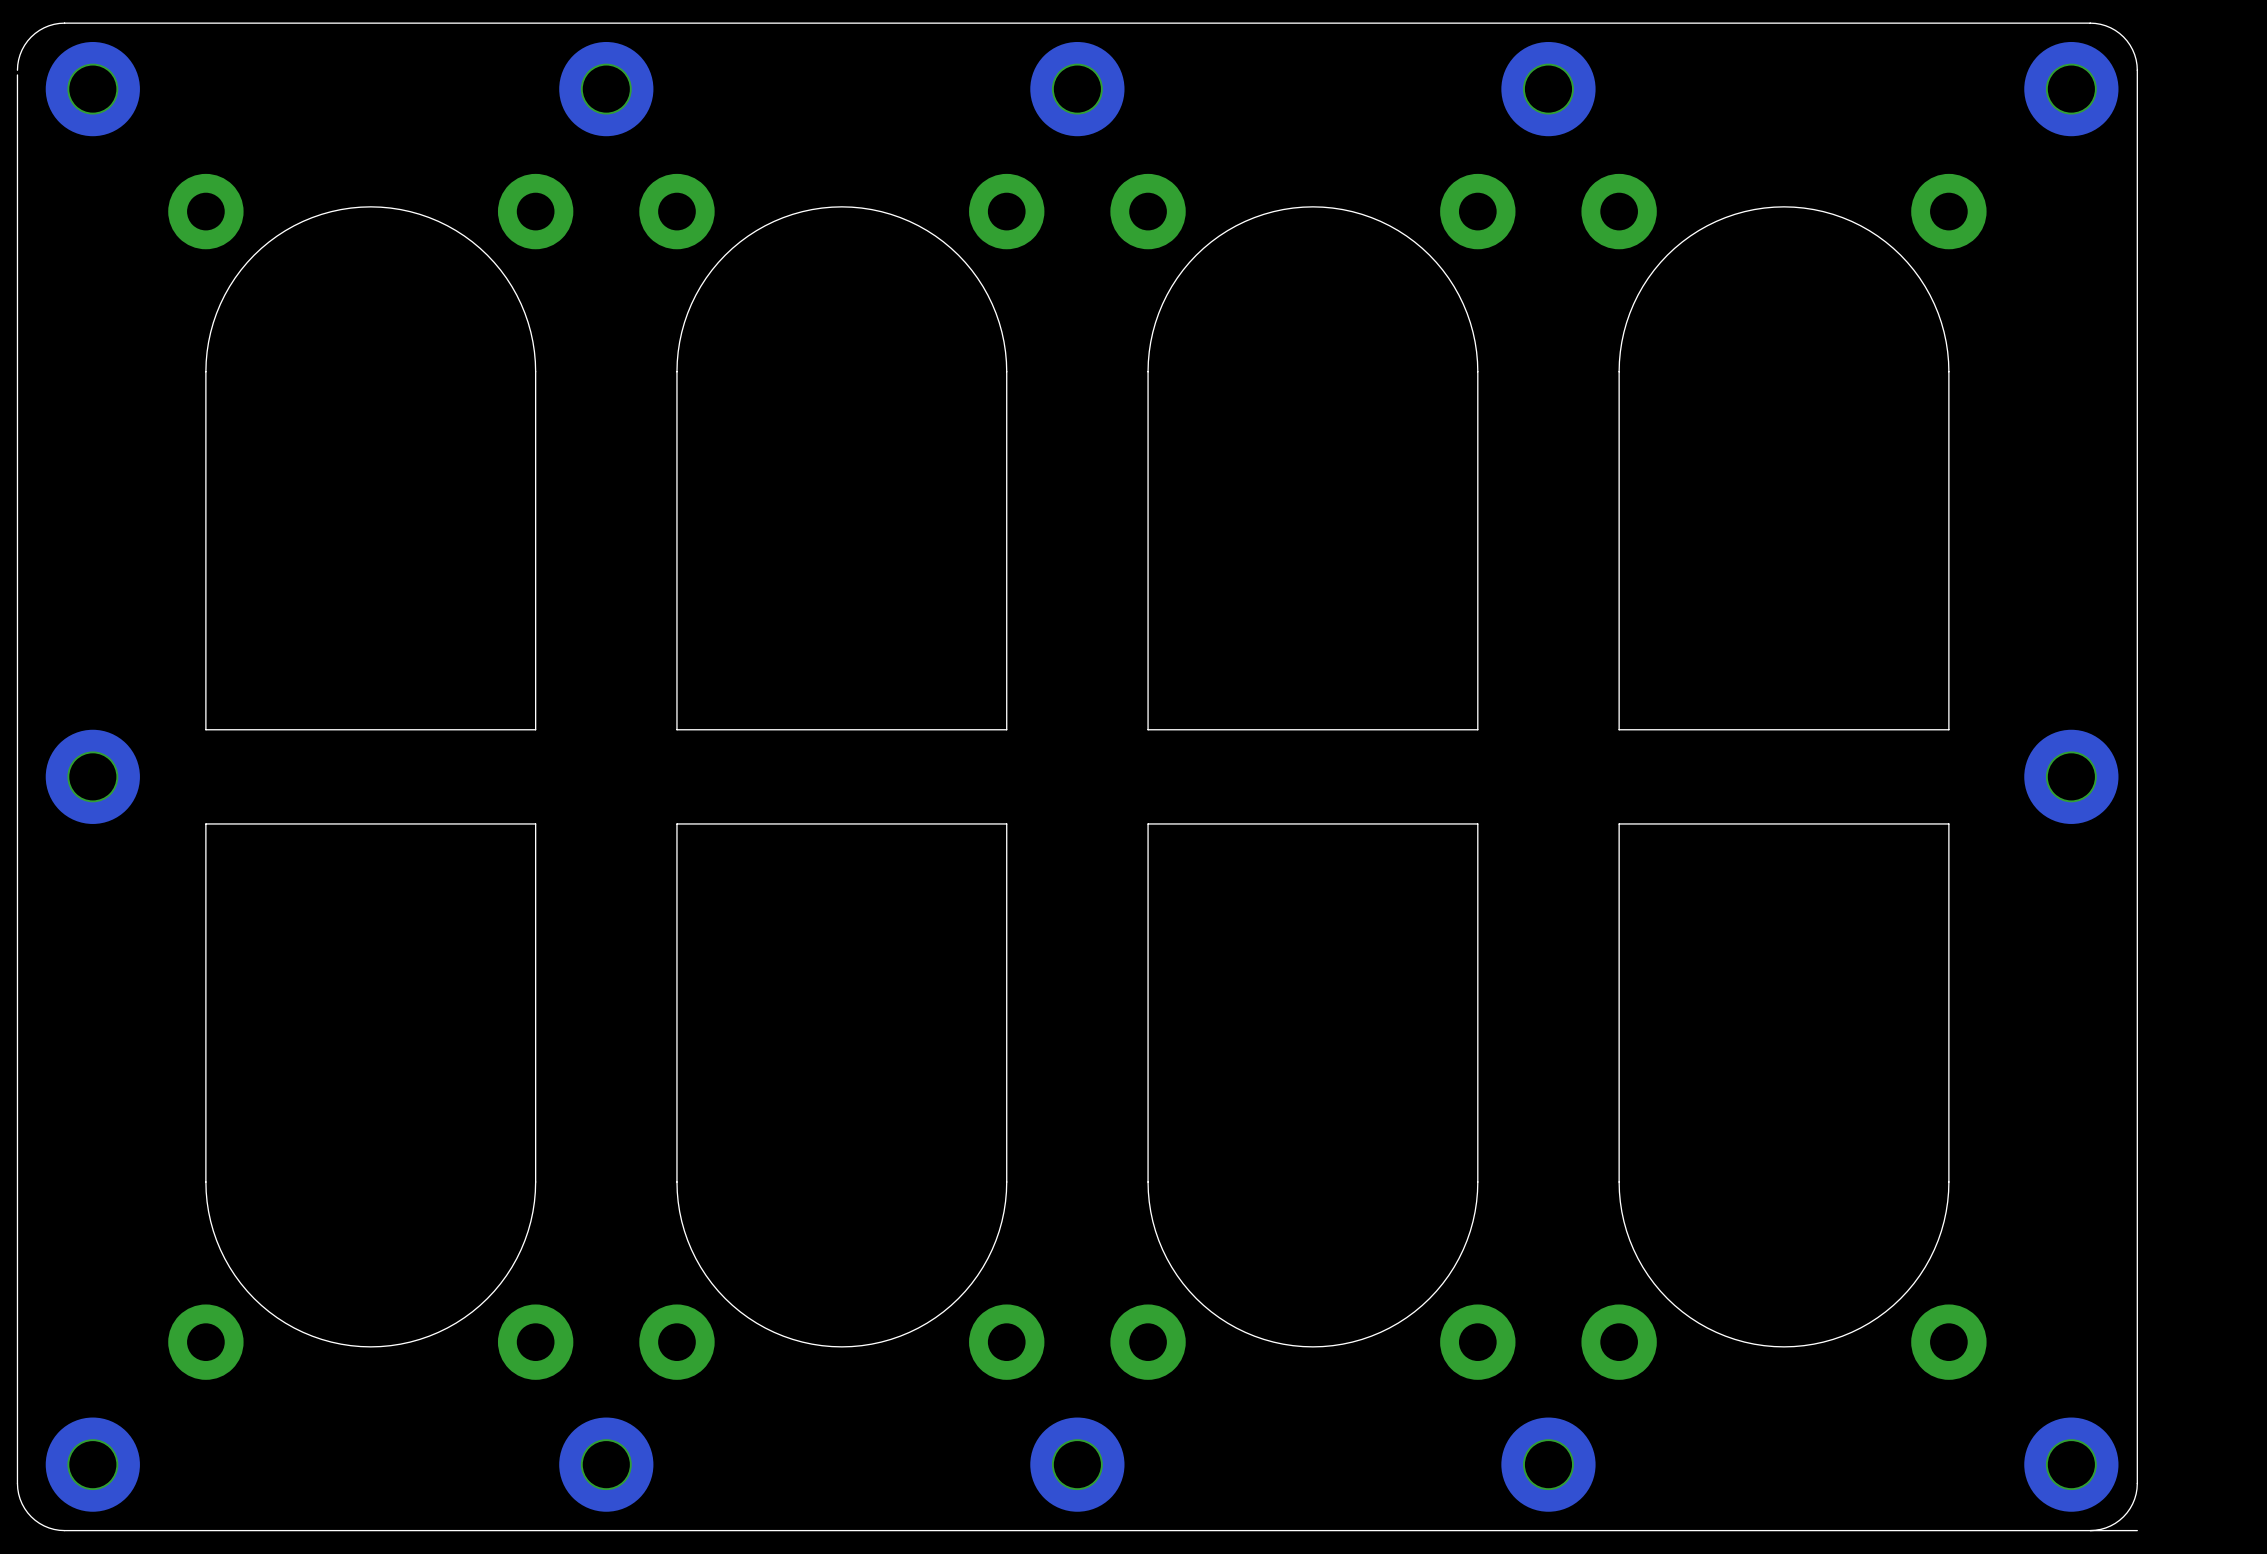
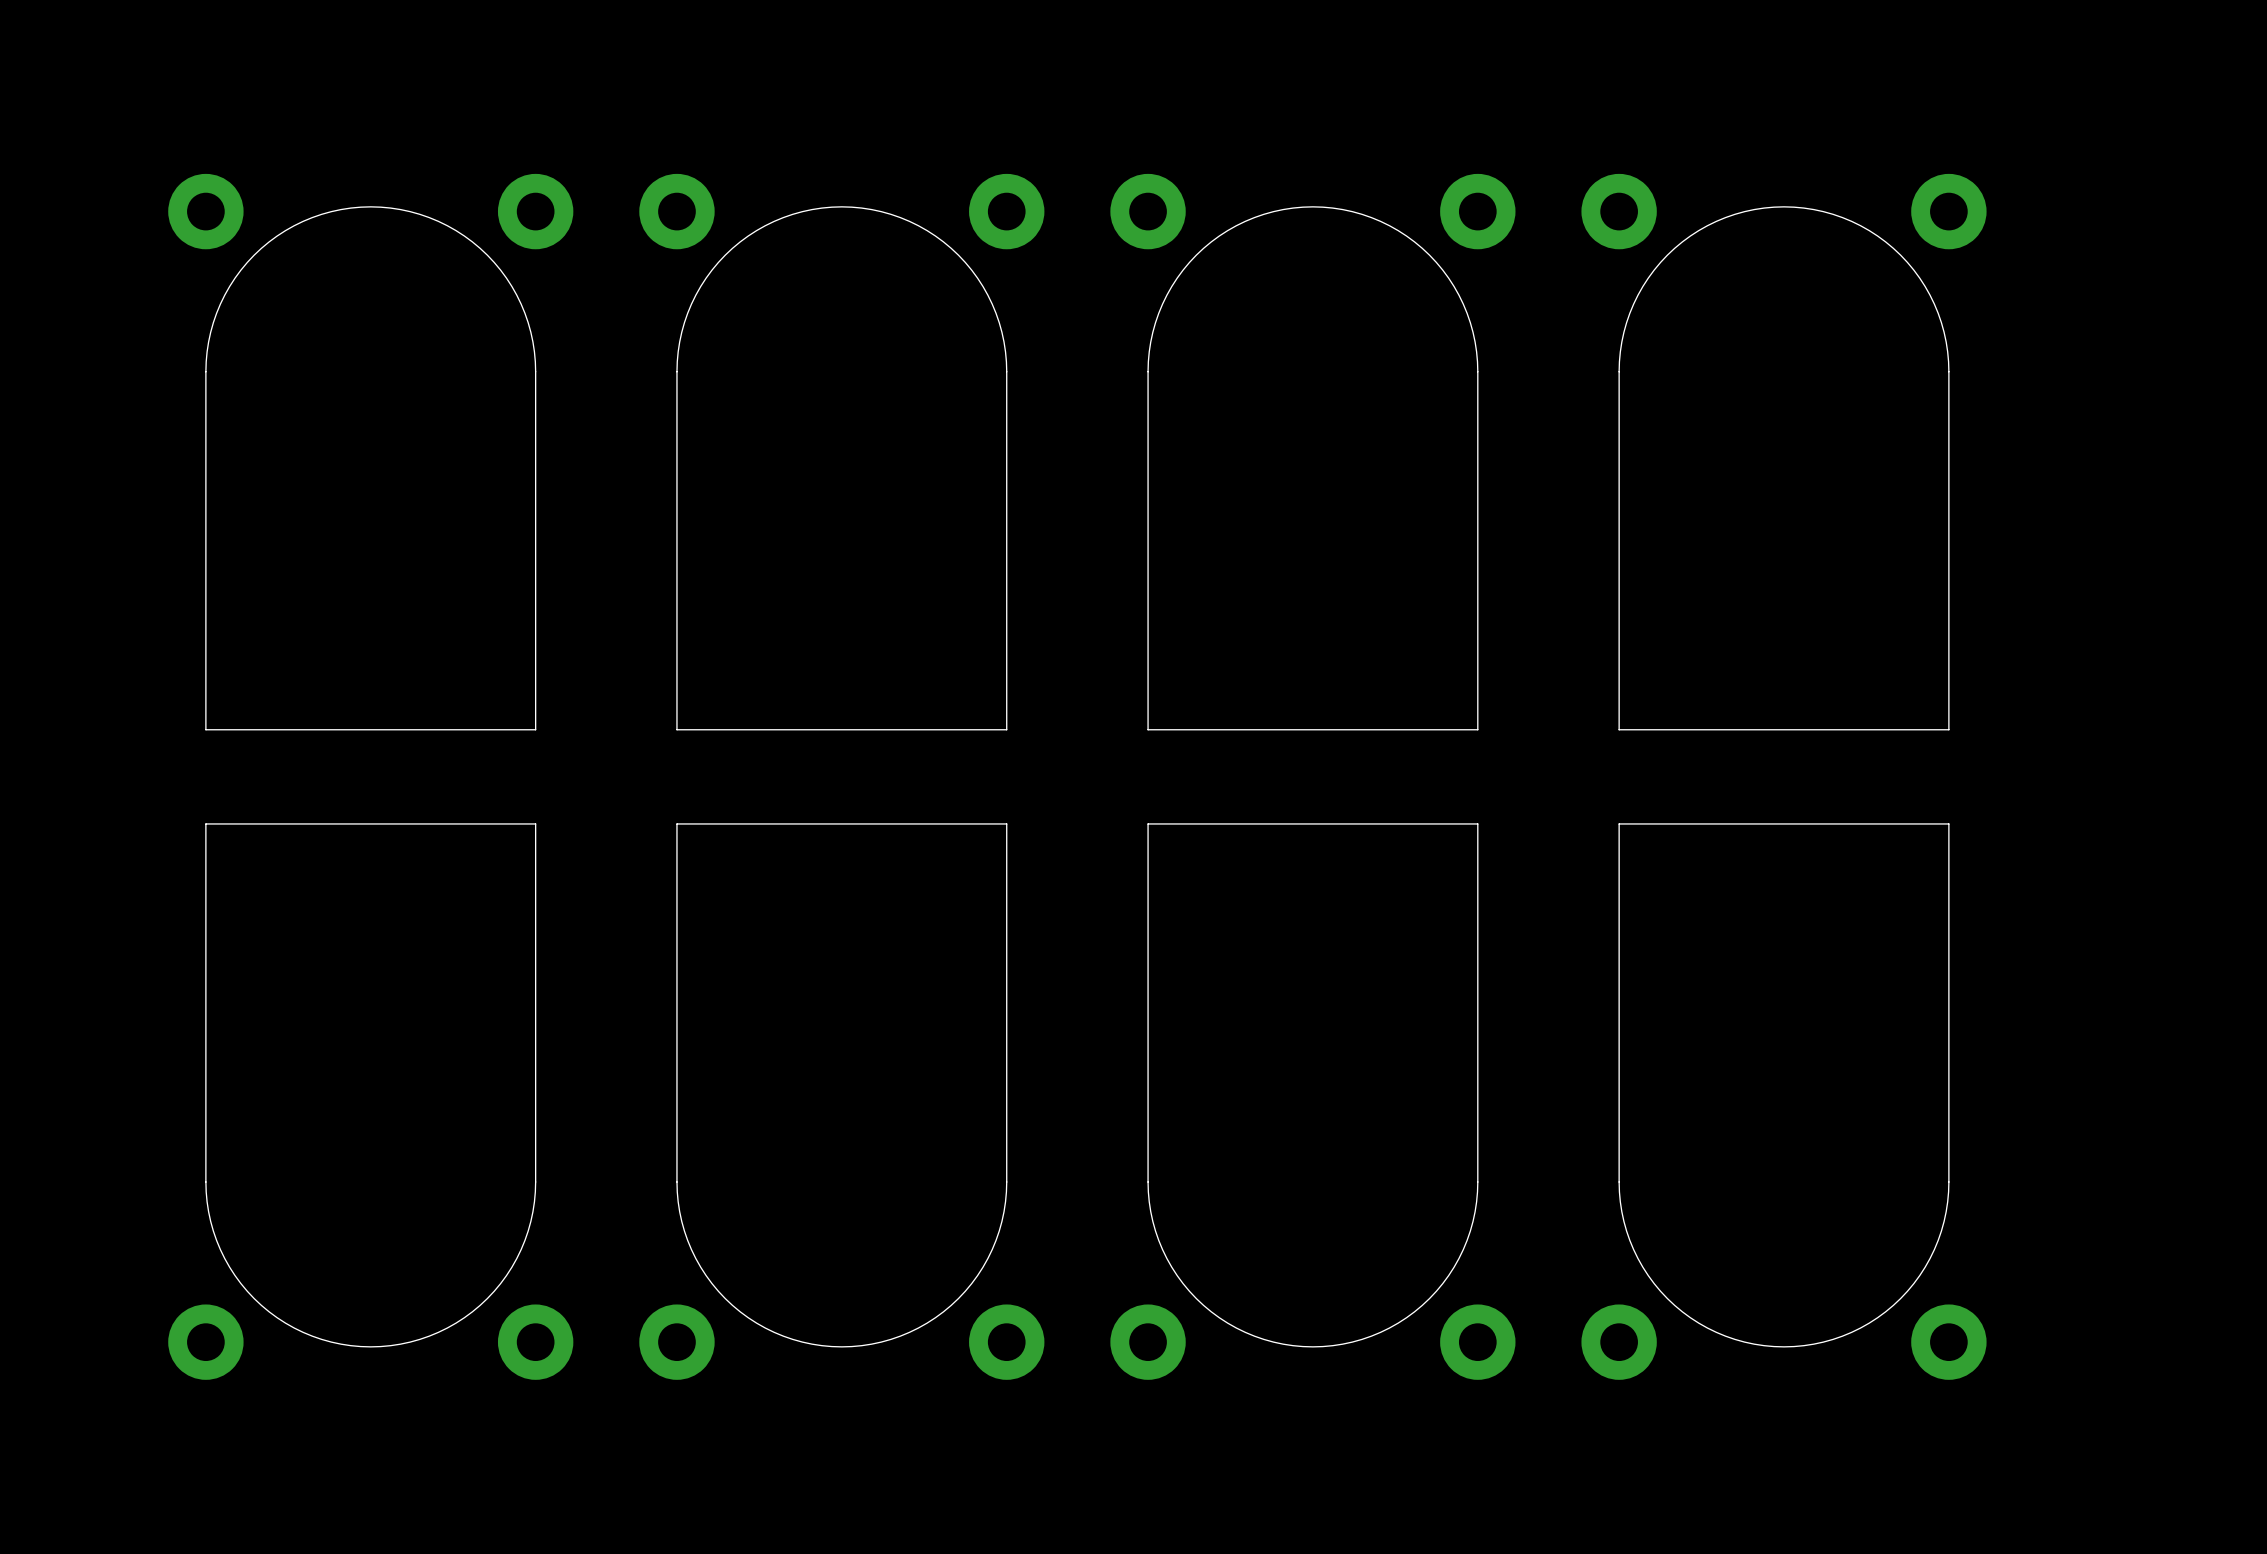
board edge: (17, 70) (22, 49) (31, 36) (49, 25) (64, 23) (2090, 23) (2105, 25) (2115, 30) (2123, 36) (2132, 49) (2137, 70) (2137, 1483) (2134, 1499) (2123, 1516) (2105, 1527) (2090, 1530) -> none
board edge: (17, 74) (17, 1483) (22, 1503) (27, 1512) (39, 1523) (49, 1527) (64, 1530) (2137, 1530) -> none
part: (92, 89) -> none
part: (606, 89) -> none
part: (1077, 89) -> none
part: (1548, 89) -> none
part: (2071, 89) -> none
part: (92, 776) -> none
part: (2071, 776) -> none
part: (92, 1464) -> none
part: (606, 1464) -> none
part: (1077, 1464) -> none
part: (1548, 1464) -> none
part: (2071, 1464) -> none

